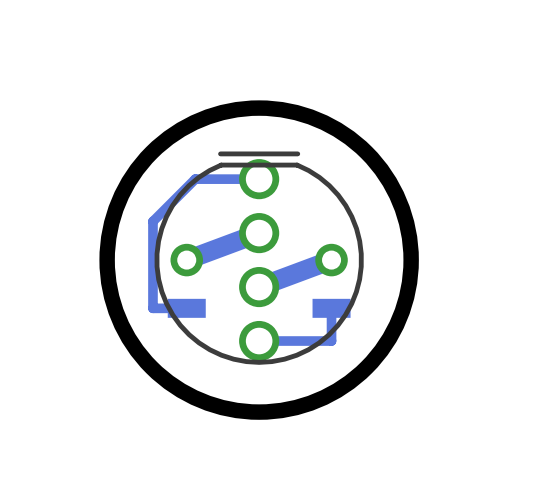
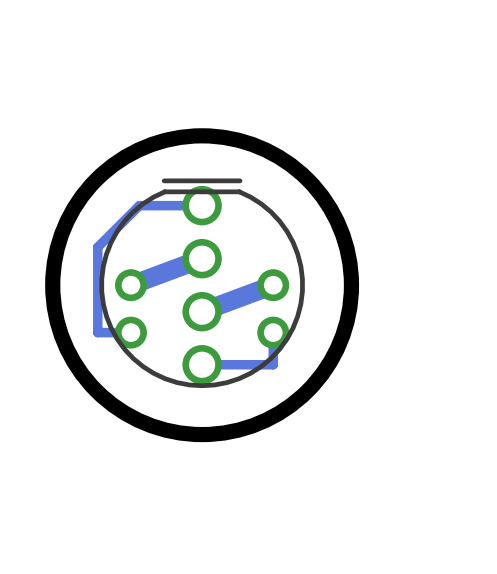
part footprint: [167, 298, 206, 318] -> [114, 316, 147, 349]
part footprint: [312, 298, 351, 318] -> [257, 316, 290, 349]

